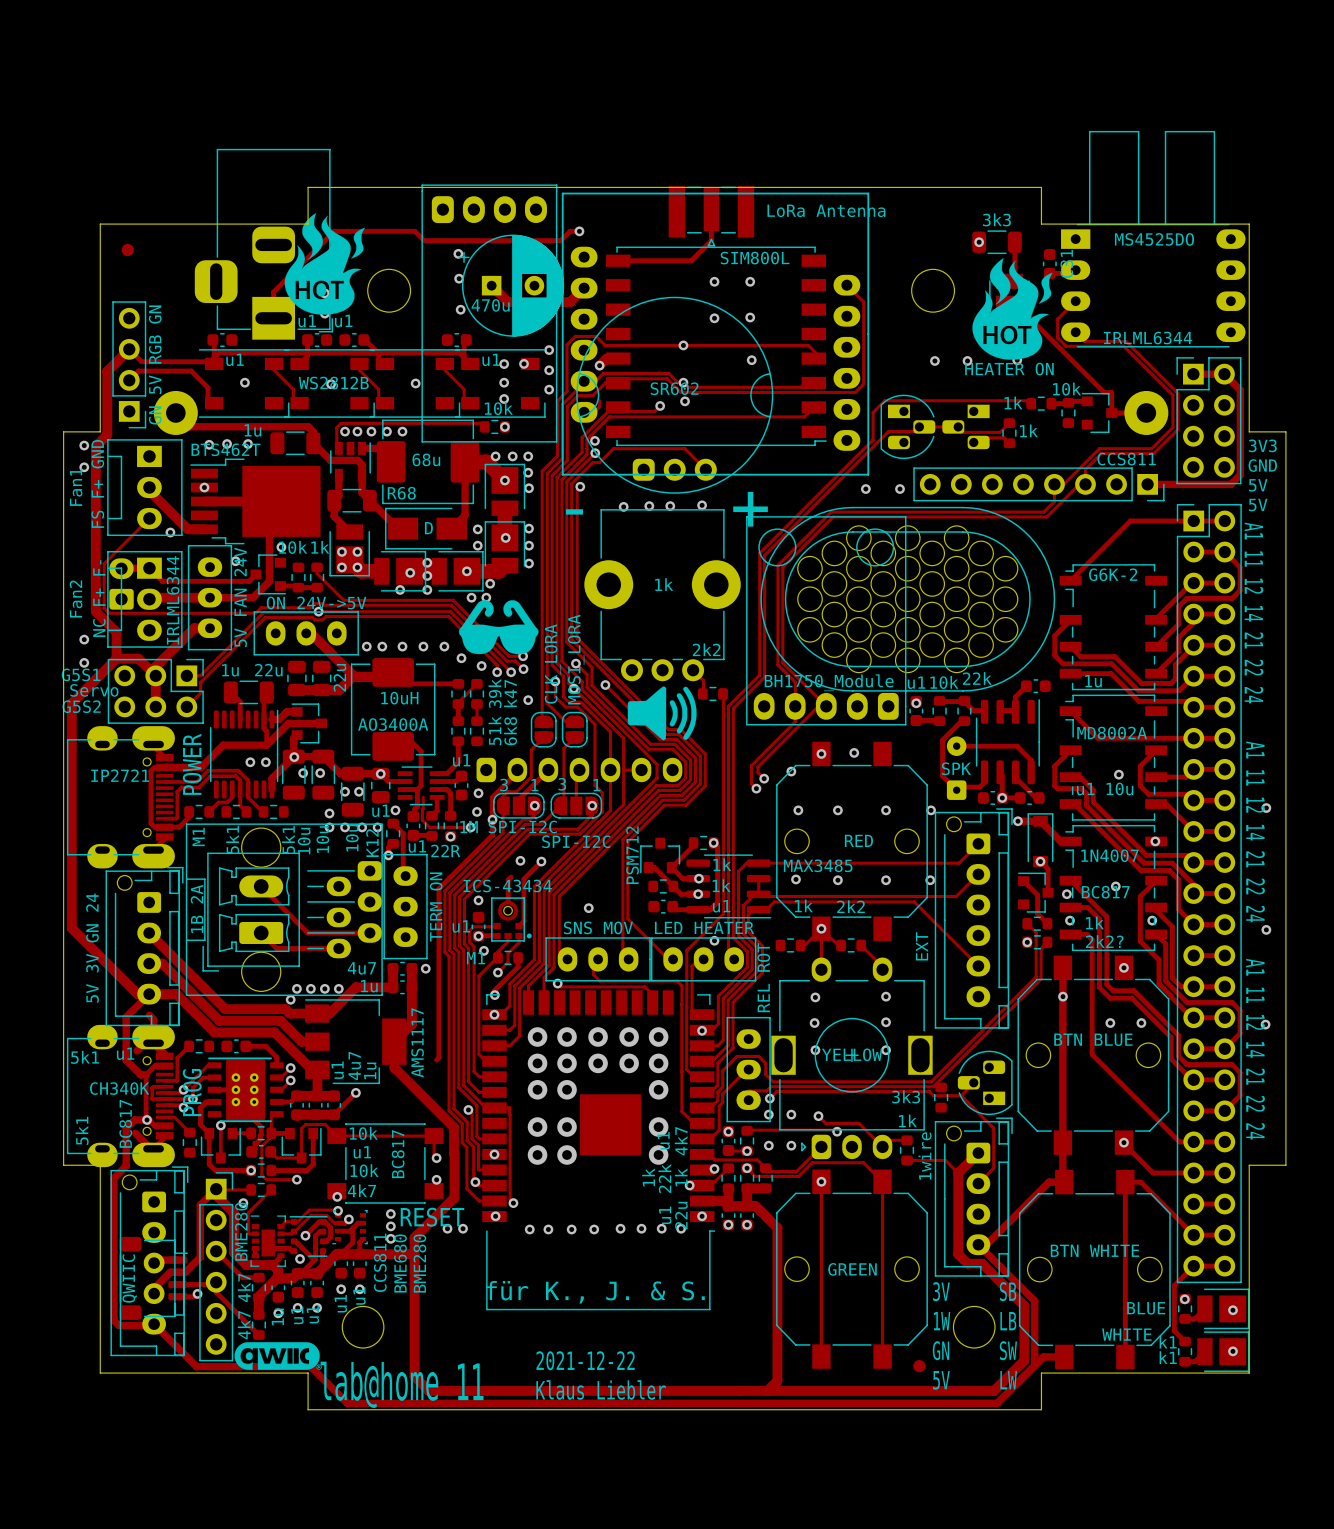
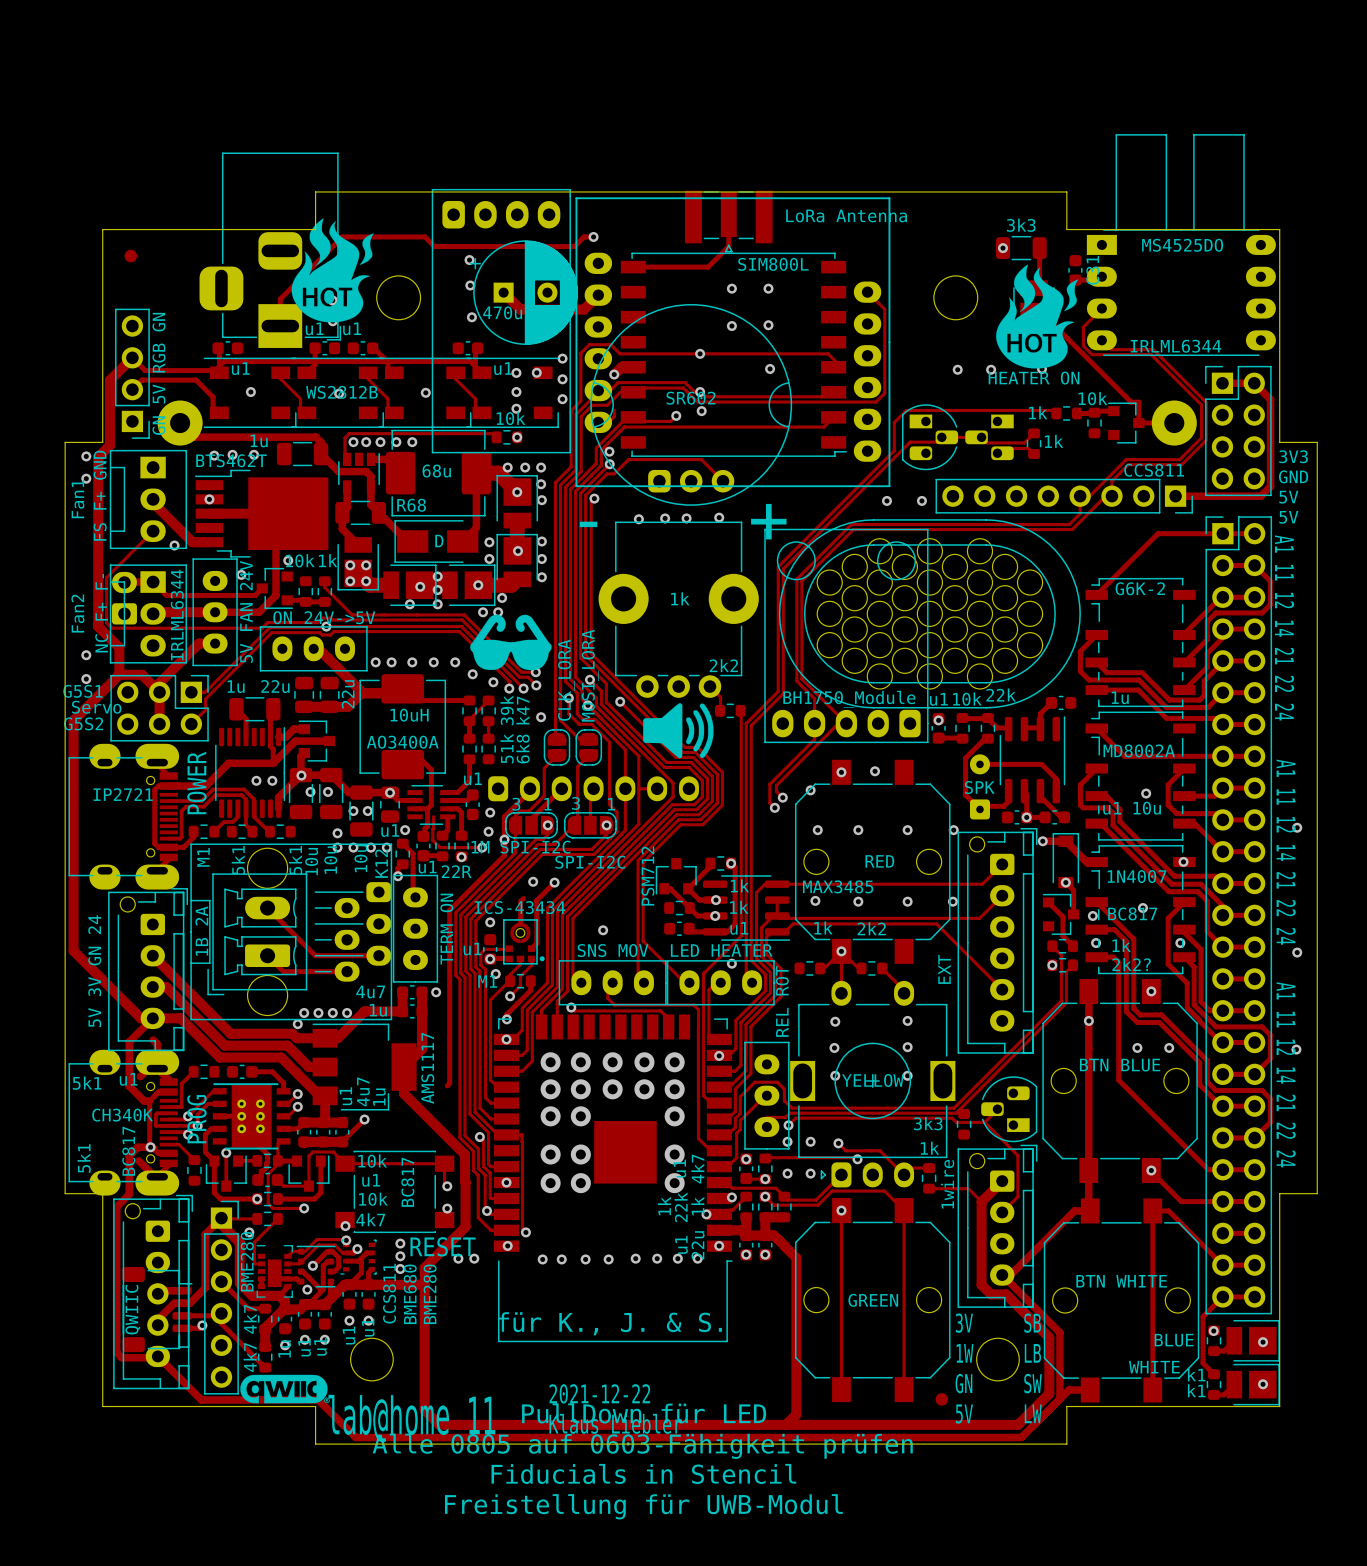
text: none -> PullDown für LED (644, 1413)
text: none -> Alle 0805 auf 0603-Fähigkeit prüfen (642, 1446)
text: none -> Fiducials in Stencil (643, 1473)
text: none -> Freistellung für UWB-Modul (643, 1506)

